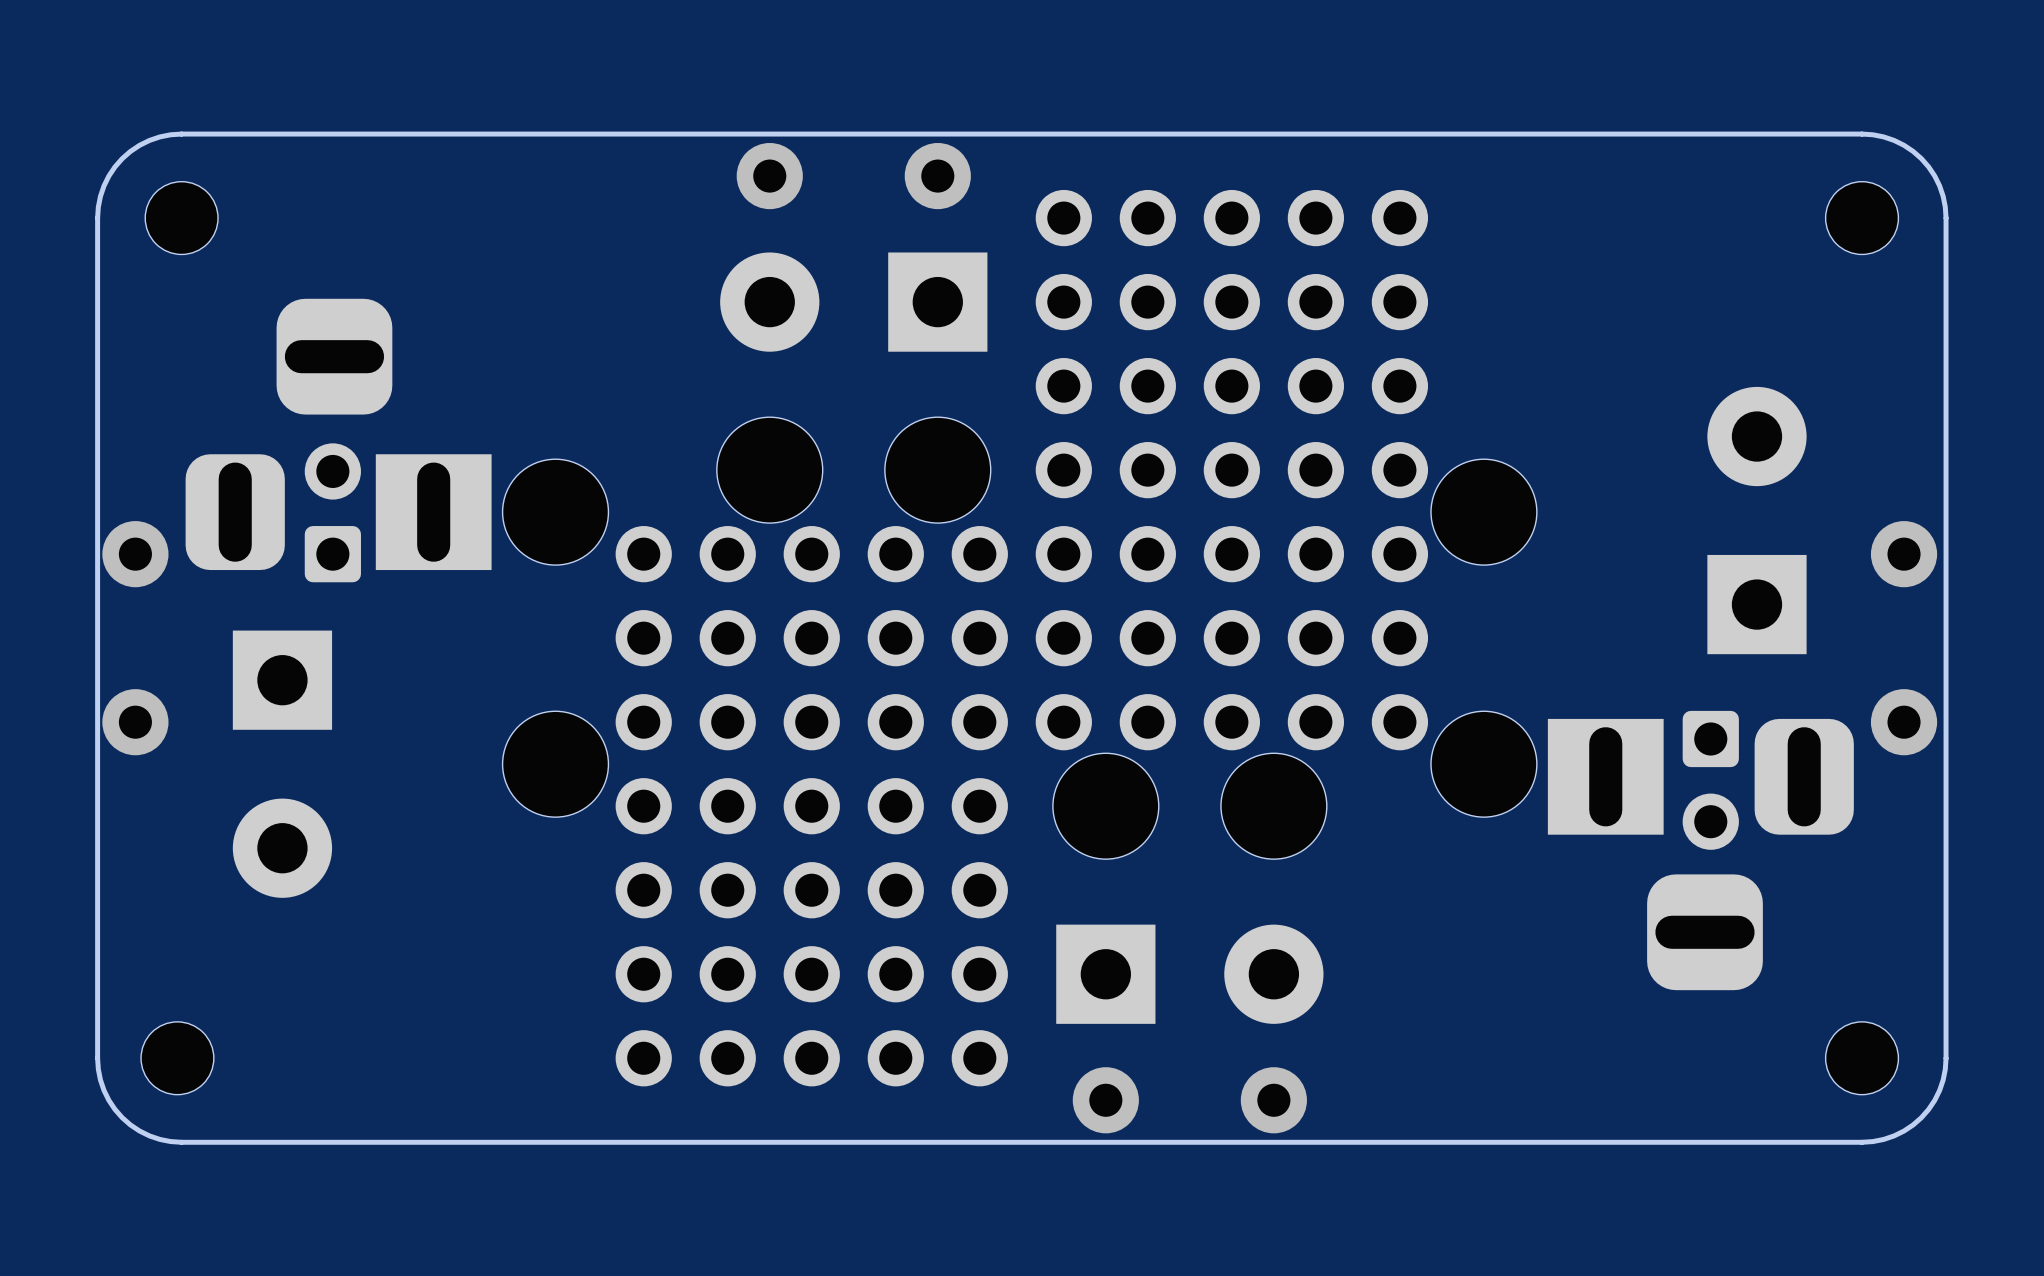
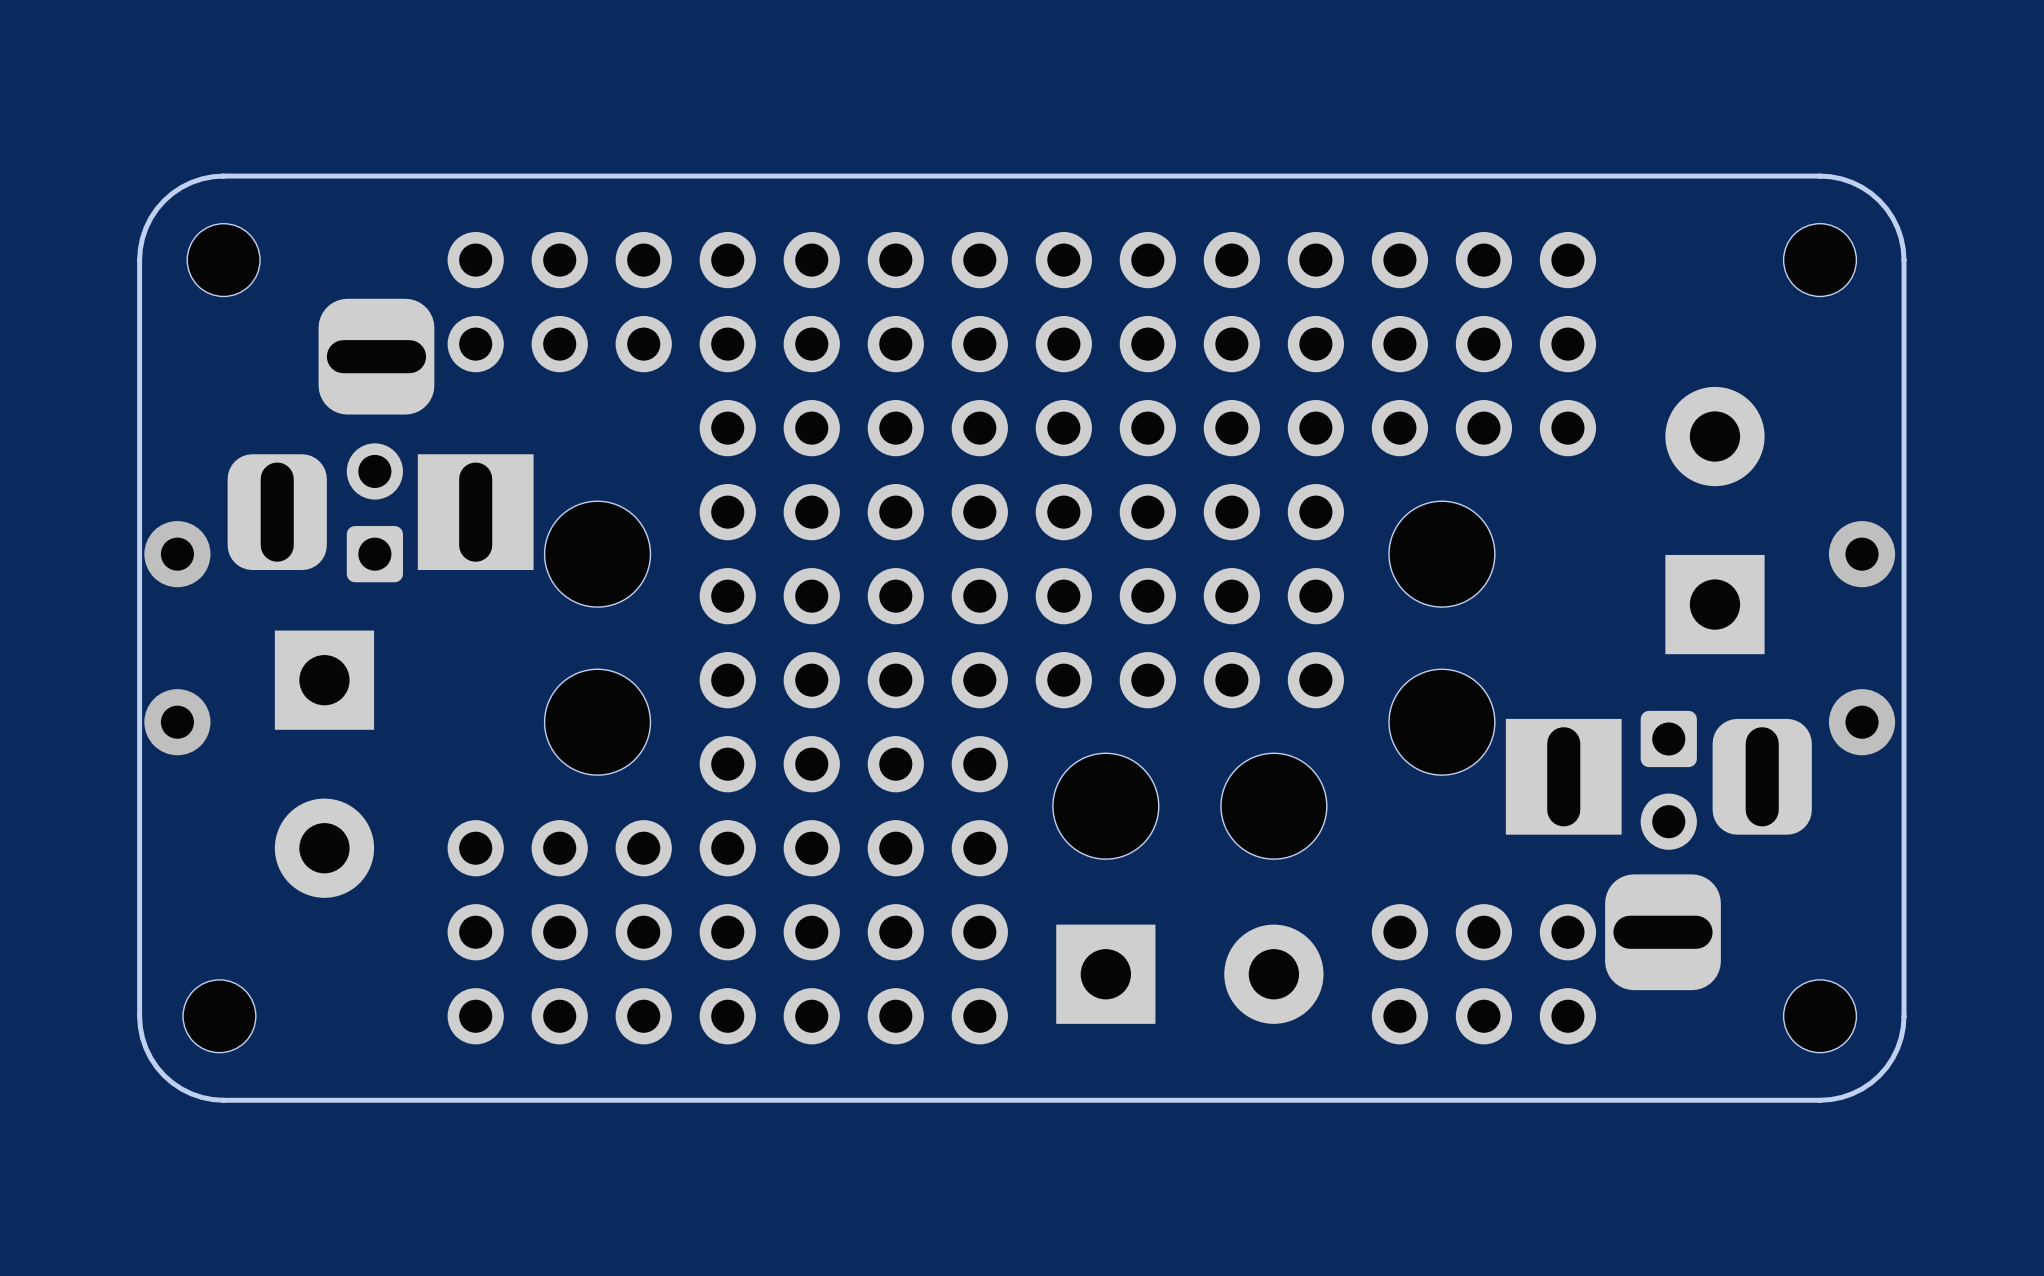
board edge: (1862, 134) (181, 134) (159, 136) (139, 145) (122, 158) (108, 176) (100, 196) (97, 218) (97, 1058) (100, 1080) (108, 1100) (122, 1117) (139, 1131) (159, 1139) (181, 1142) (1862, 1142) (1883, 1139) (1904, 1131) (1921, 1117) (1934, 1100) (1943, 1080) (1946, 1058) (1946, 218) (1939, 185) (1921, 158) (1894, 140) (1862, 134) -> (1820, 176) (1852, 182) (1879, 200) (1897, 227) (1904, 260) (1904, 1016) (1901, 1038) (1892, 1058) (1879, 1075) (1862, 1089) (1841, 1097) (1820, 1100) (223, 1100) (201, 1097) (181, 1089) (164, 1075) (150, 1058) (142, 1038) (139, 1016) (139, 260) (142, 238) (150, 218) (164, 200) (181, 187) (201, 178) (223, 176) (1820, 176)
via: (769, 176) -> none
via: (937, 176) -> none
part position: (181, 218) -> (223, 260)
part position: (1862, 218) -> (1820, 260)
part: none -> (559, 302)
part: (853, 302) -> none
part: none -> (1483, 344)
part position: (338, 434) -> (380, 434)
part: (769, 470) -> none
part: (937, 470) -> none
part: none -> (1189, 470)
part: (1231, 470) -> none
part position: (332, 512) -> (374, 512)
part position: (555, 512) -> (597, 554)
part position: (1483, 512) -> (1441, 554)
part position: (1756, 520) -> (1714, 520)
via position: (135, 554) -> (177, 554)
via position: (1904, 554) -> (1862, 554)
part: none -> (853, 638)
via position: (135, 722) -> (177, 722)
via position: (1904, 722) -> (1862, 722)
part position: (282, 764) -> (324, 764)
part position: (555, 764) -> (597, 722)
part position: (1483, 764) -> (1441, 722)
part position: (1710, 780) -> (1668, 780)
part: (811, 806) -> none
part position: (1700, 854) -> (1658, 854)
part: none -> (559, 932)
part: none -> (1483, 974)
part position: (177, 1058) -> (219, 1016)
part position: (1862, 1058) -> (1820, 1016)
via: (1105, 1100) -> none
via: (1273, 1100) -> none

